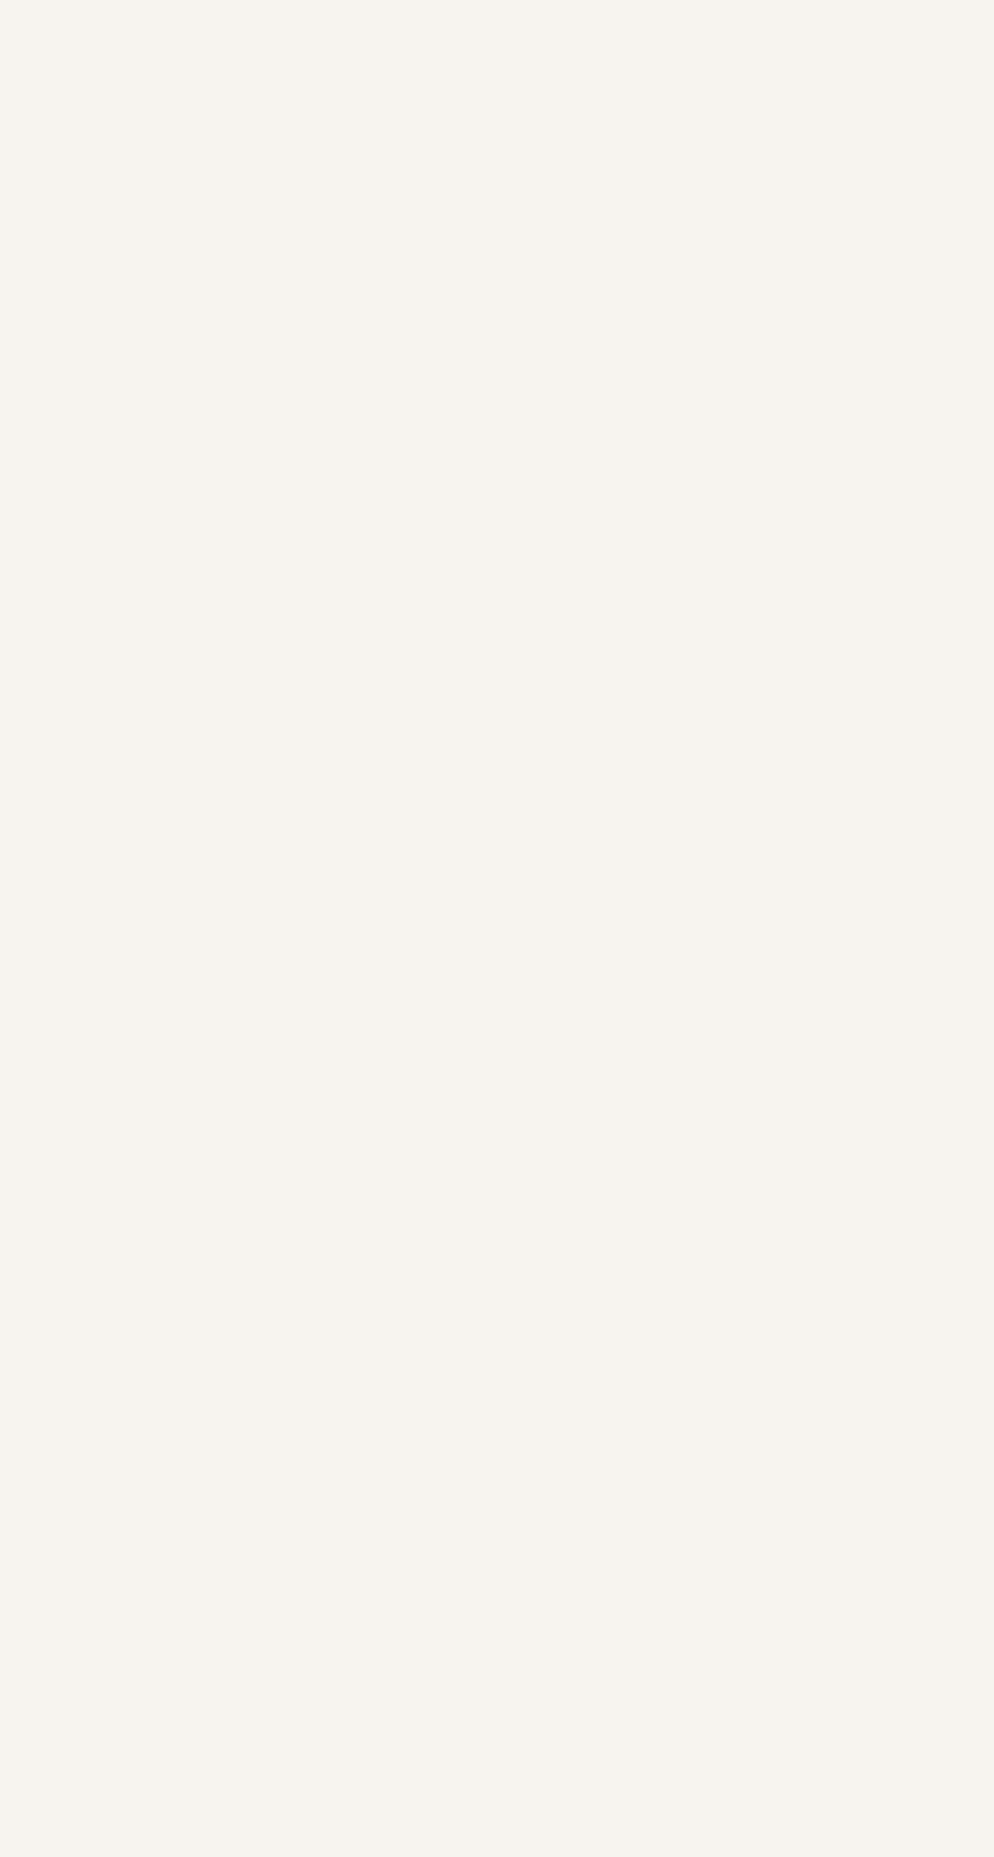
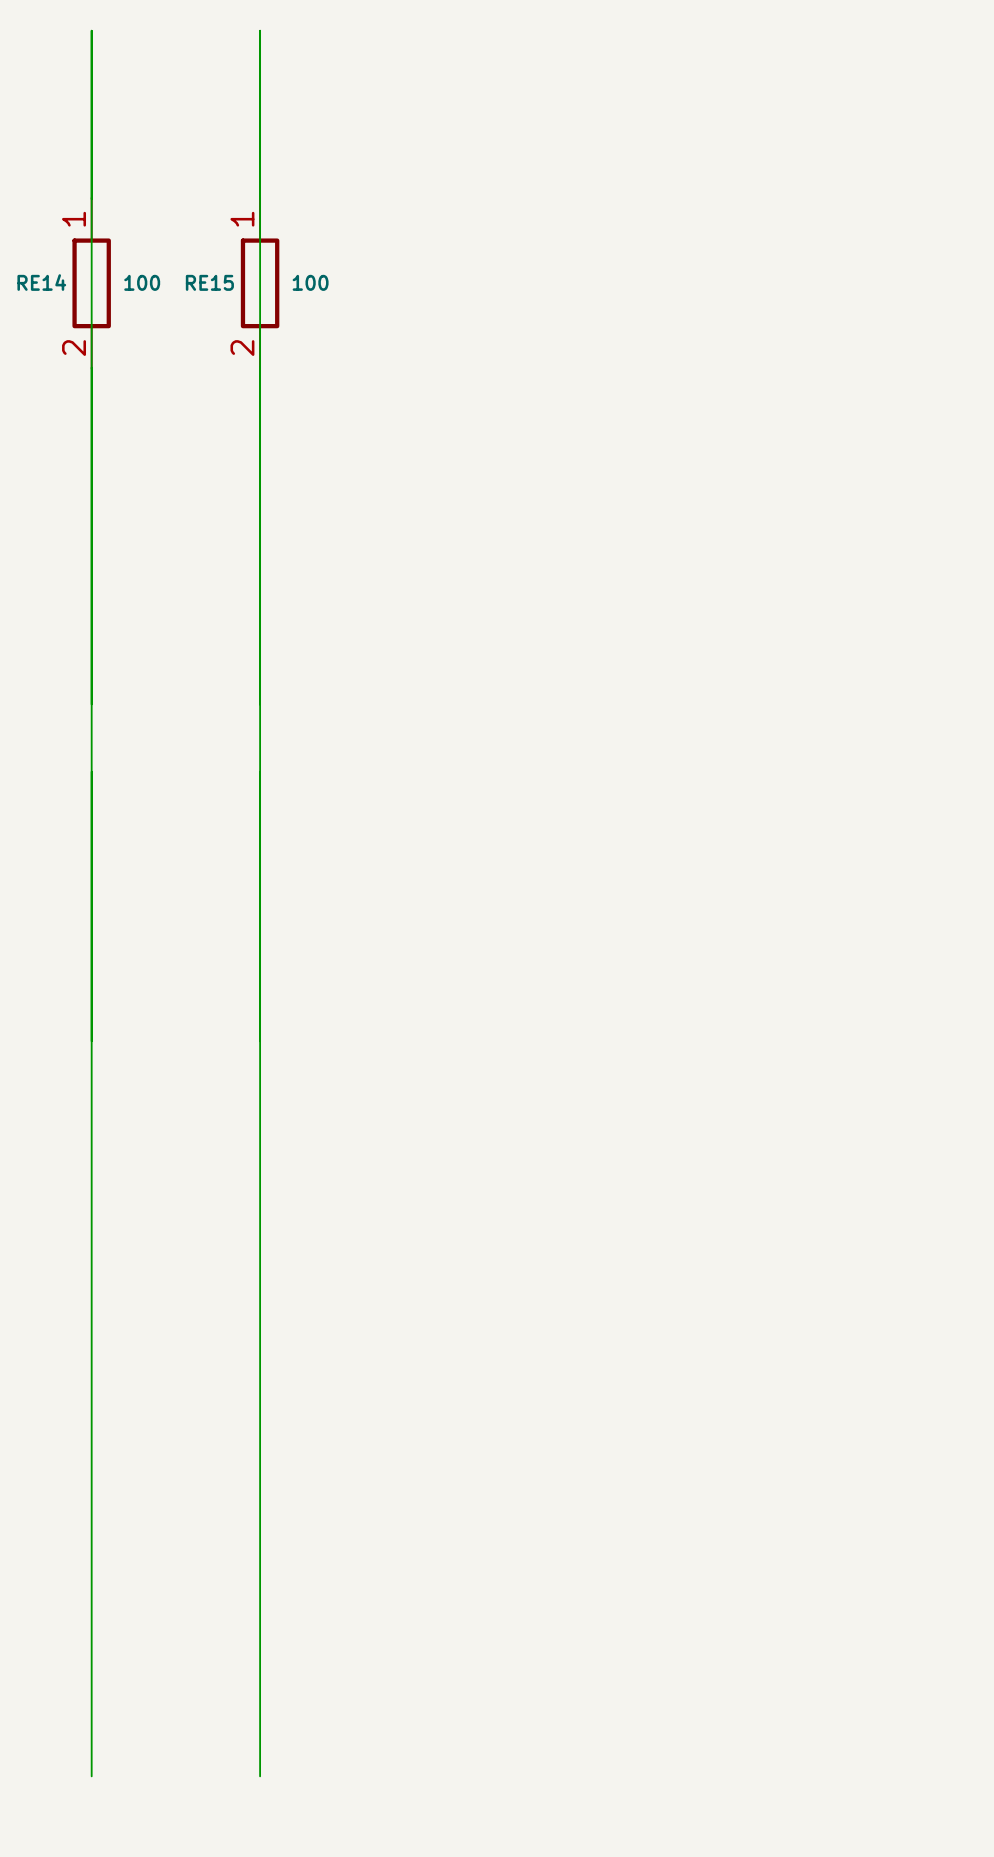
wire: none -> (91, 30) (91, 1776)
wire: none -> (260, 30) (260, 1776)
RE14: none -> 100 (91, 283)
RE15: none -> 100 (260, 283)

